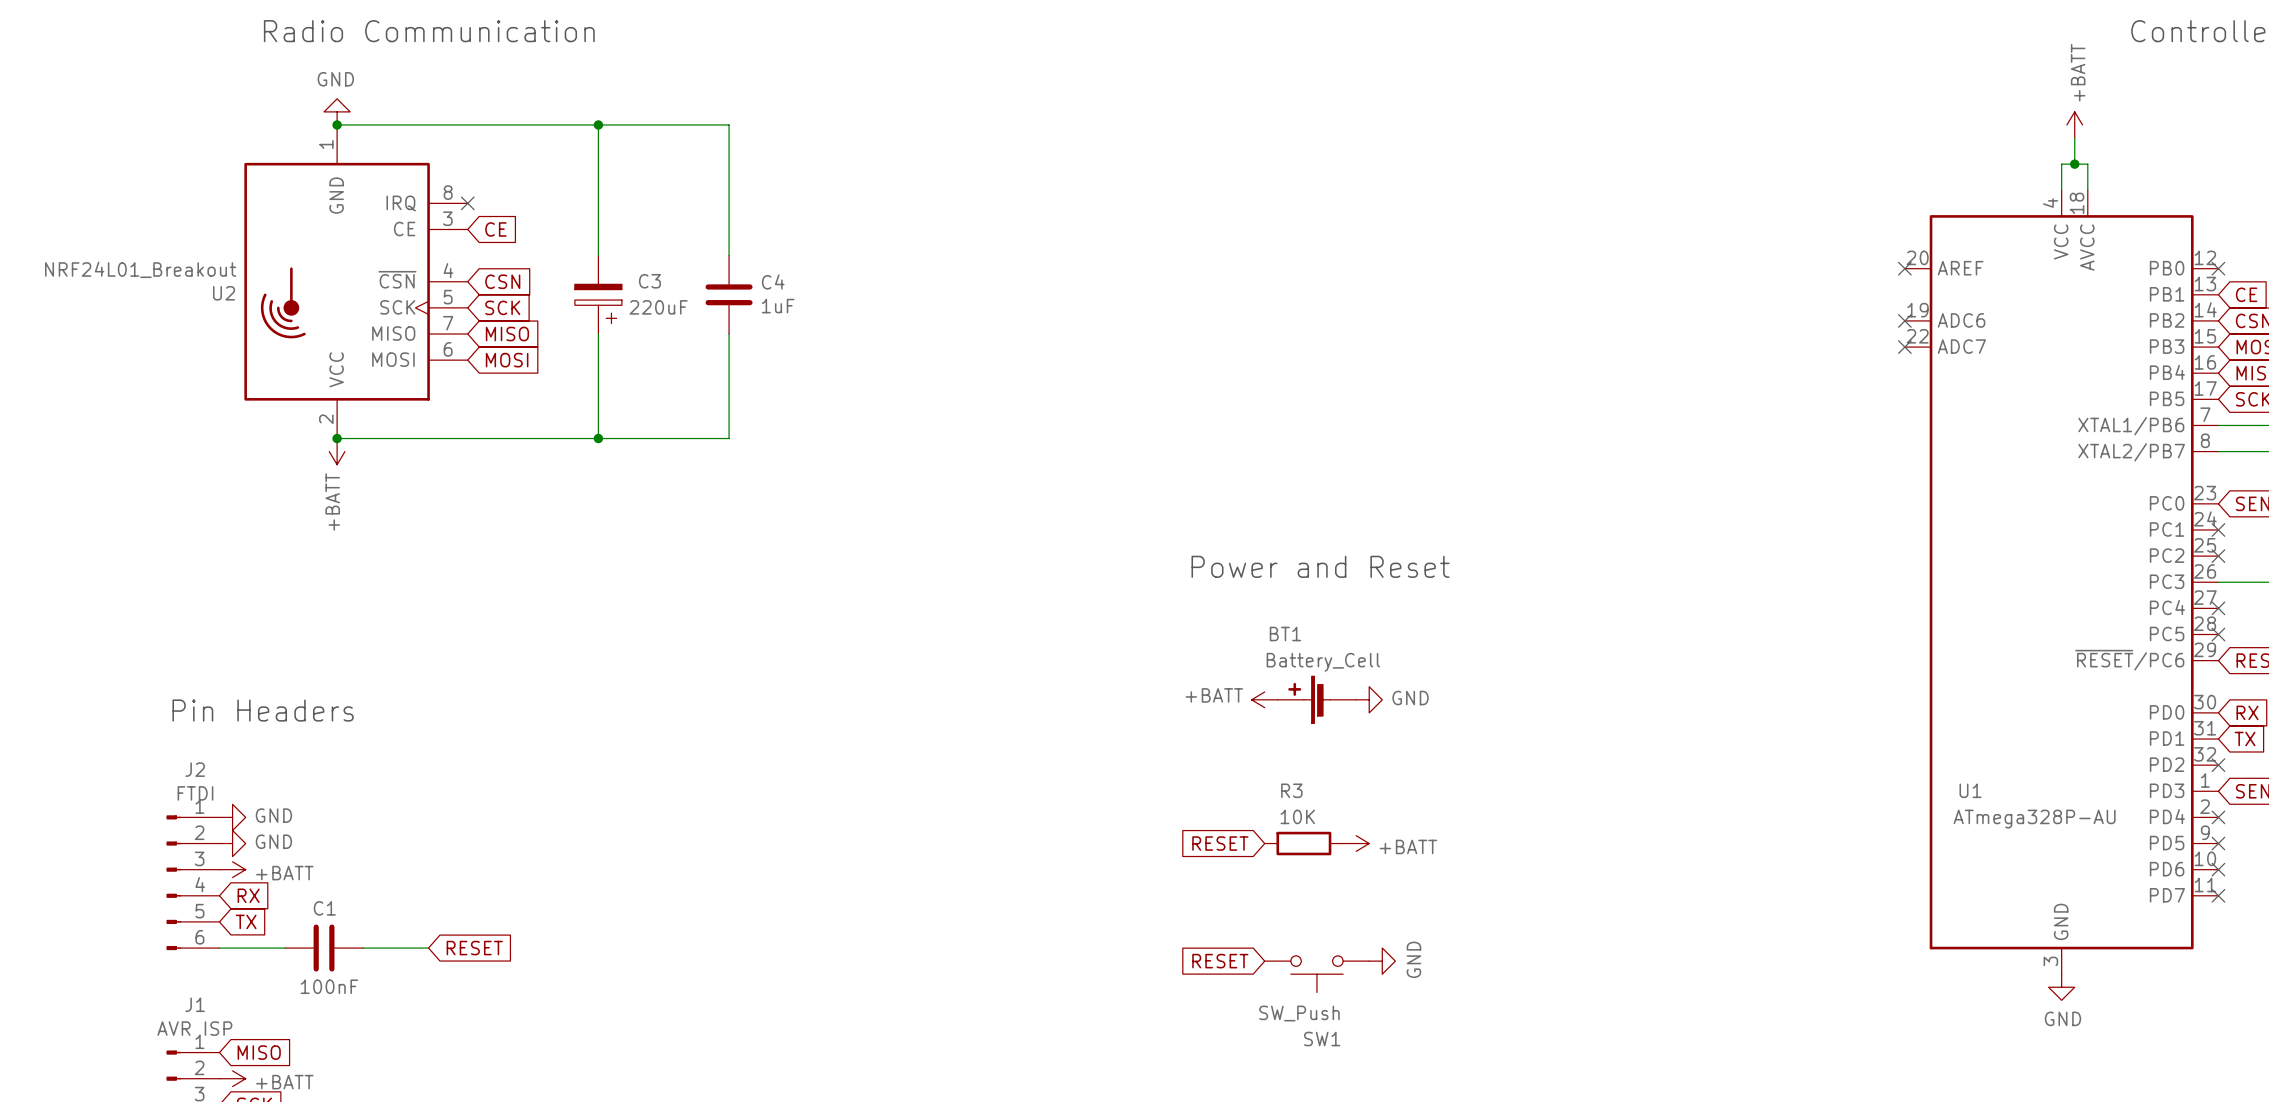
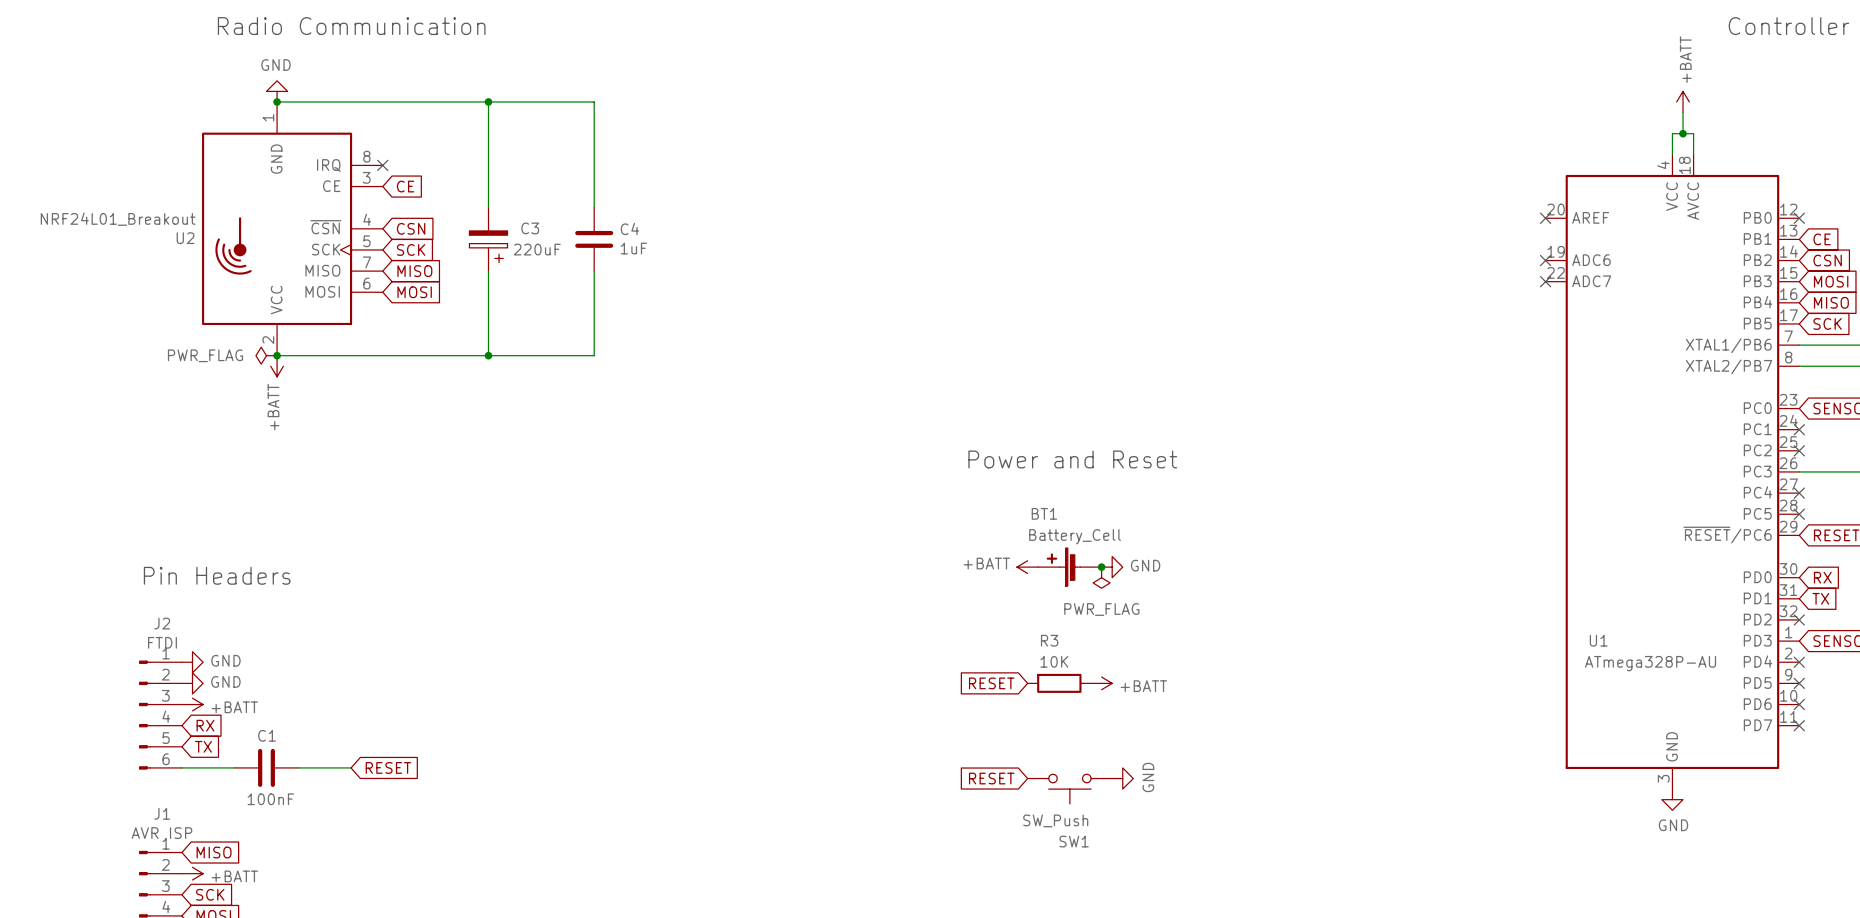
power symbol: none -> PWR_FLAG (266, 355)
junction: none -> (1101, 567)
power symbol: none -> PWR_FLAG (1101, 577)

